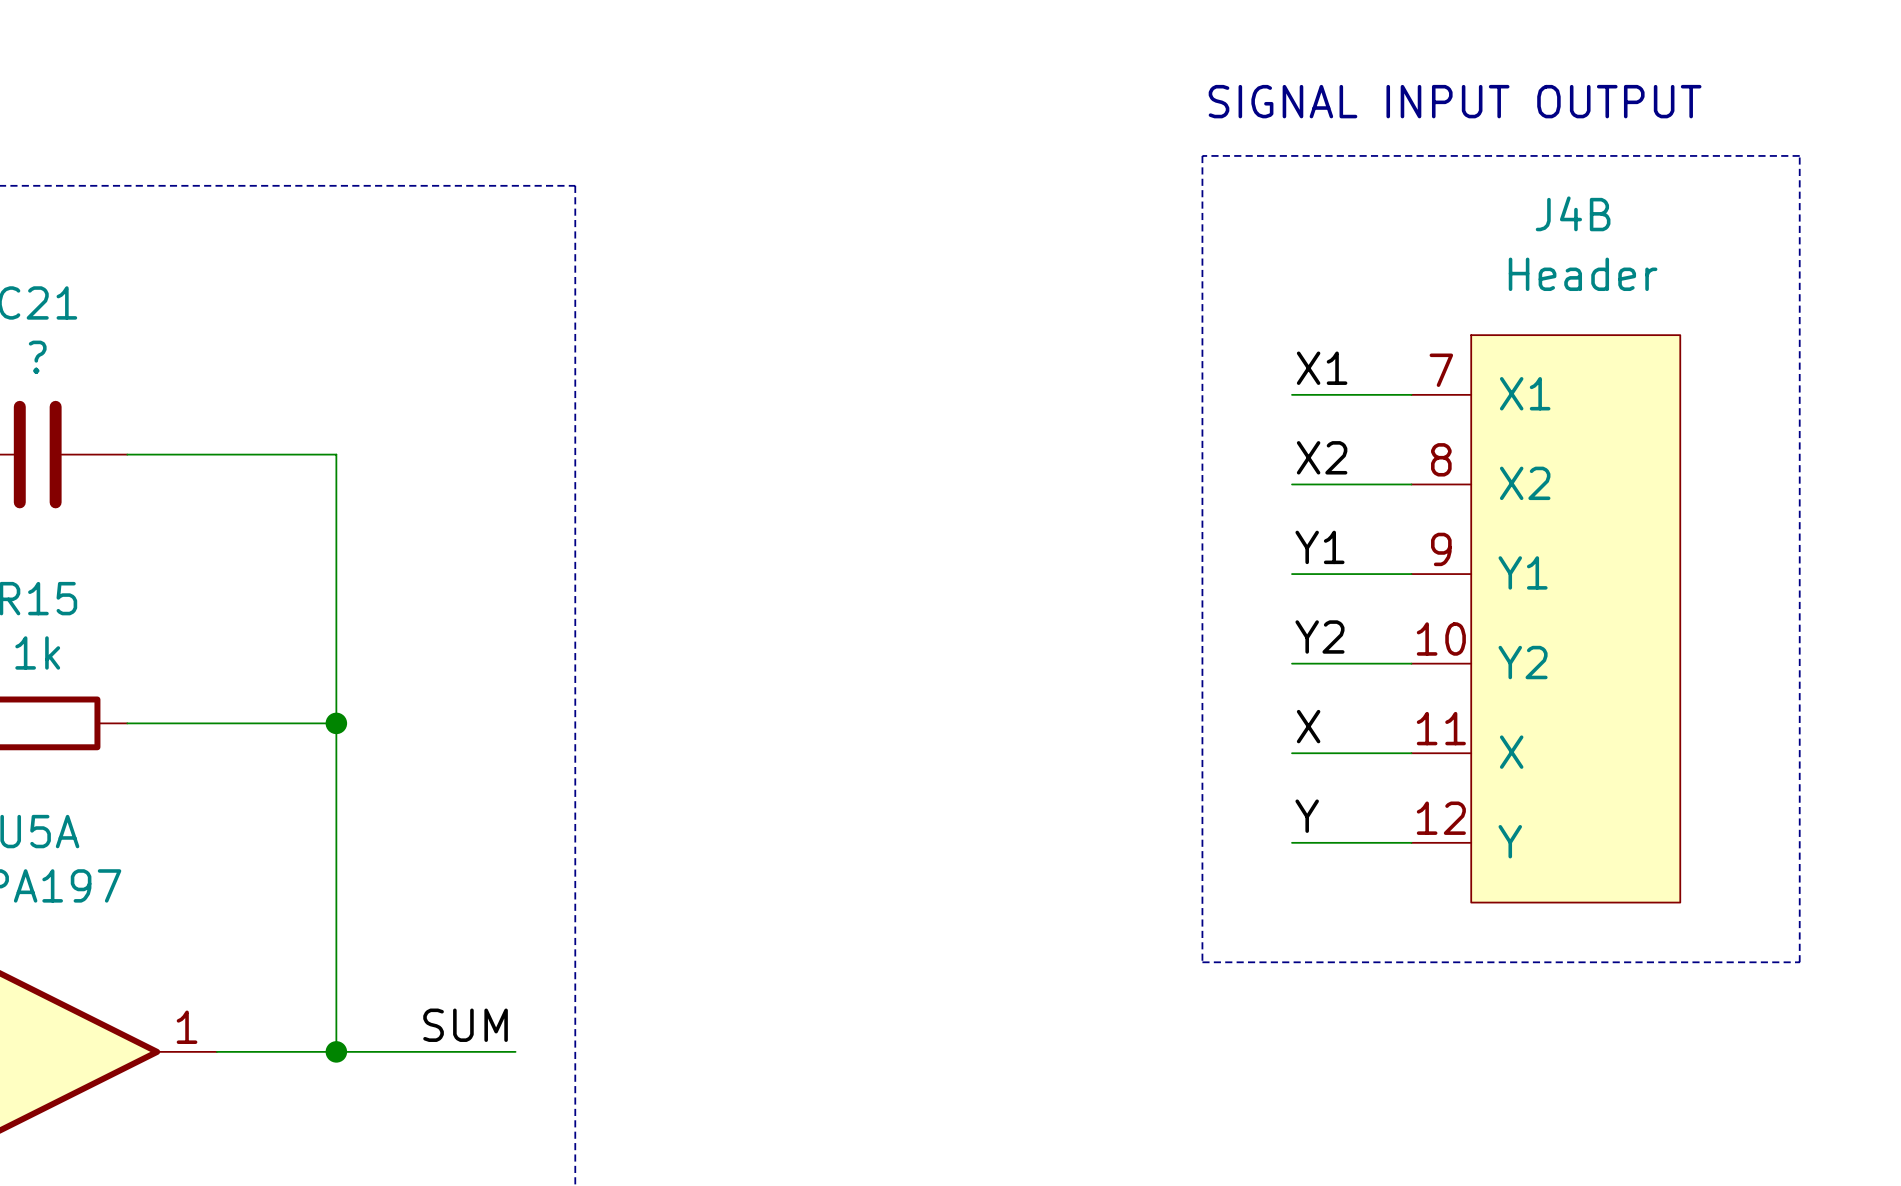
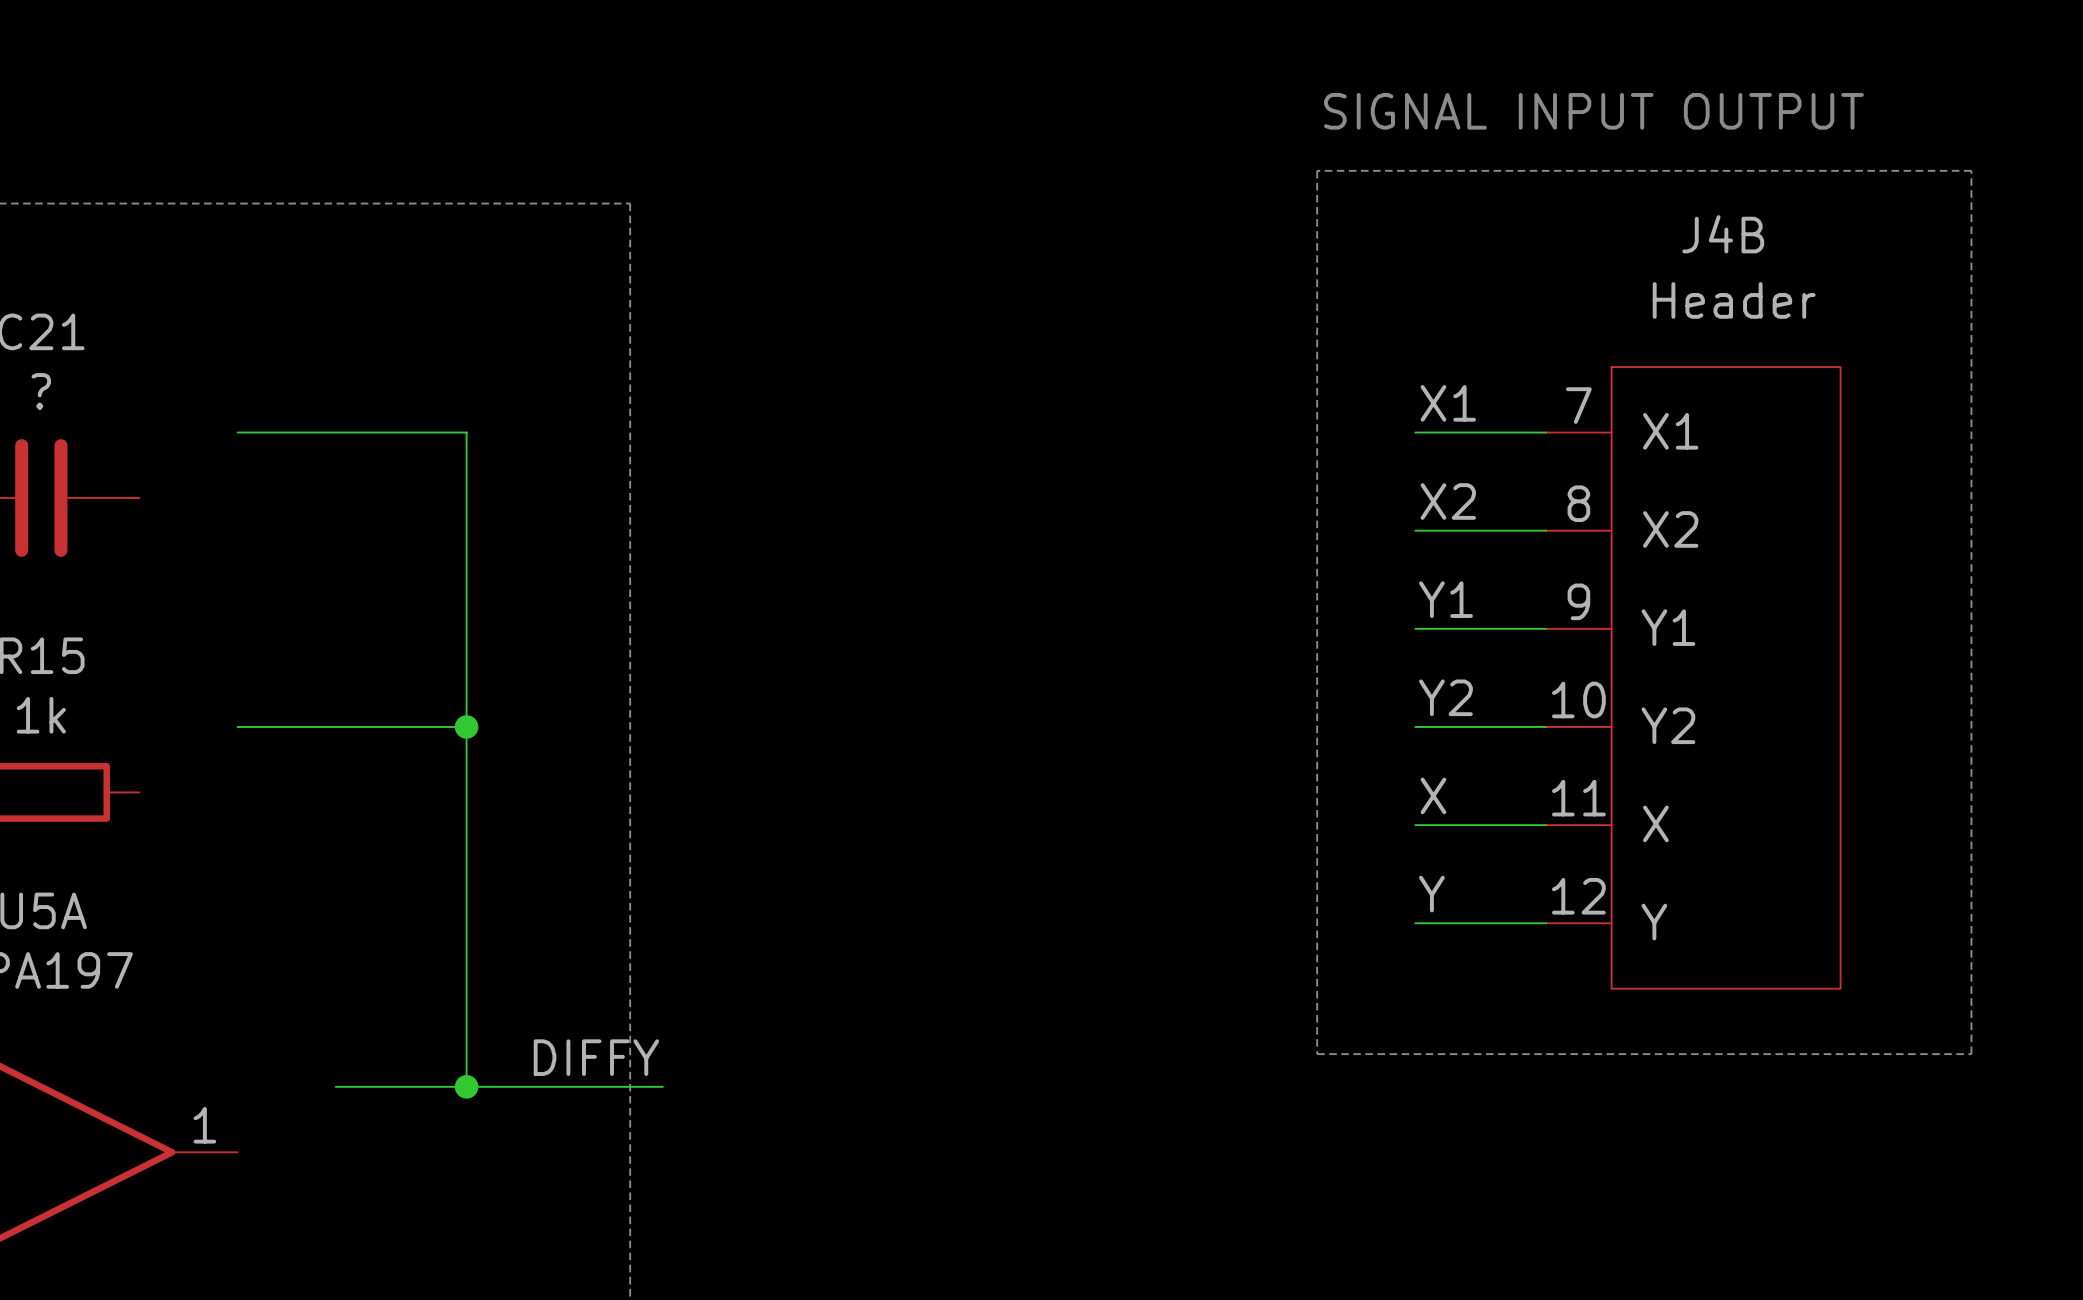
wire: (127, 454) (336, 454) (336, 1051) -> (237, 432) (466, 432) (466, 1086)
wire: (127, 723) (336, 723) -> (237, 726) (466, 726)
junction position: (336, 723) -> (466, 726)
label: none -> DIFFY (596, 1057)
label: SUM (465, 1025) -> none
wire: (216, 1051) (515, 1051) -> (335, 1086) (662, 1086)
junction position: (336, 1051) -> (466, 1086)

